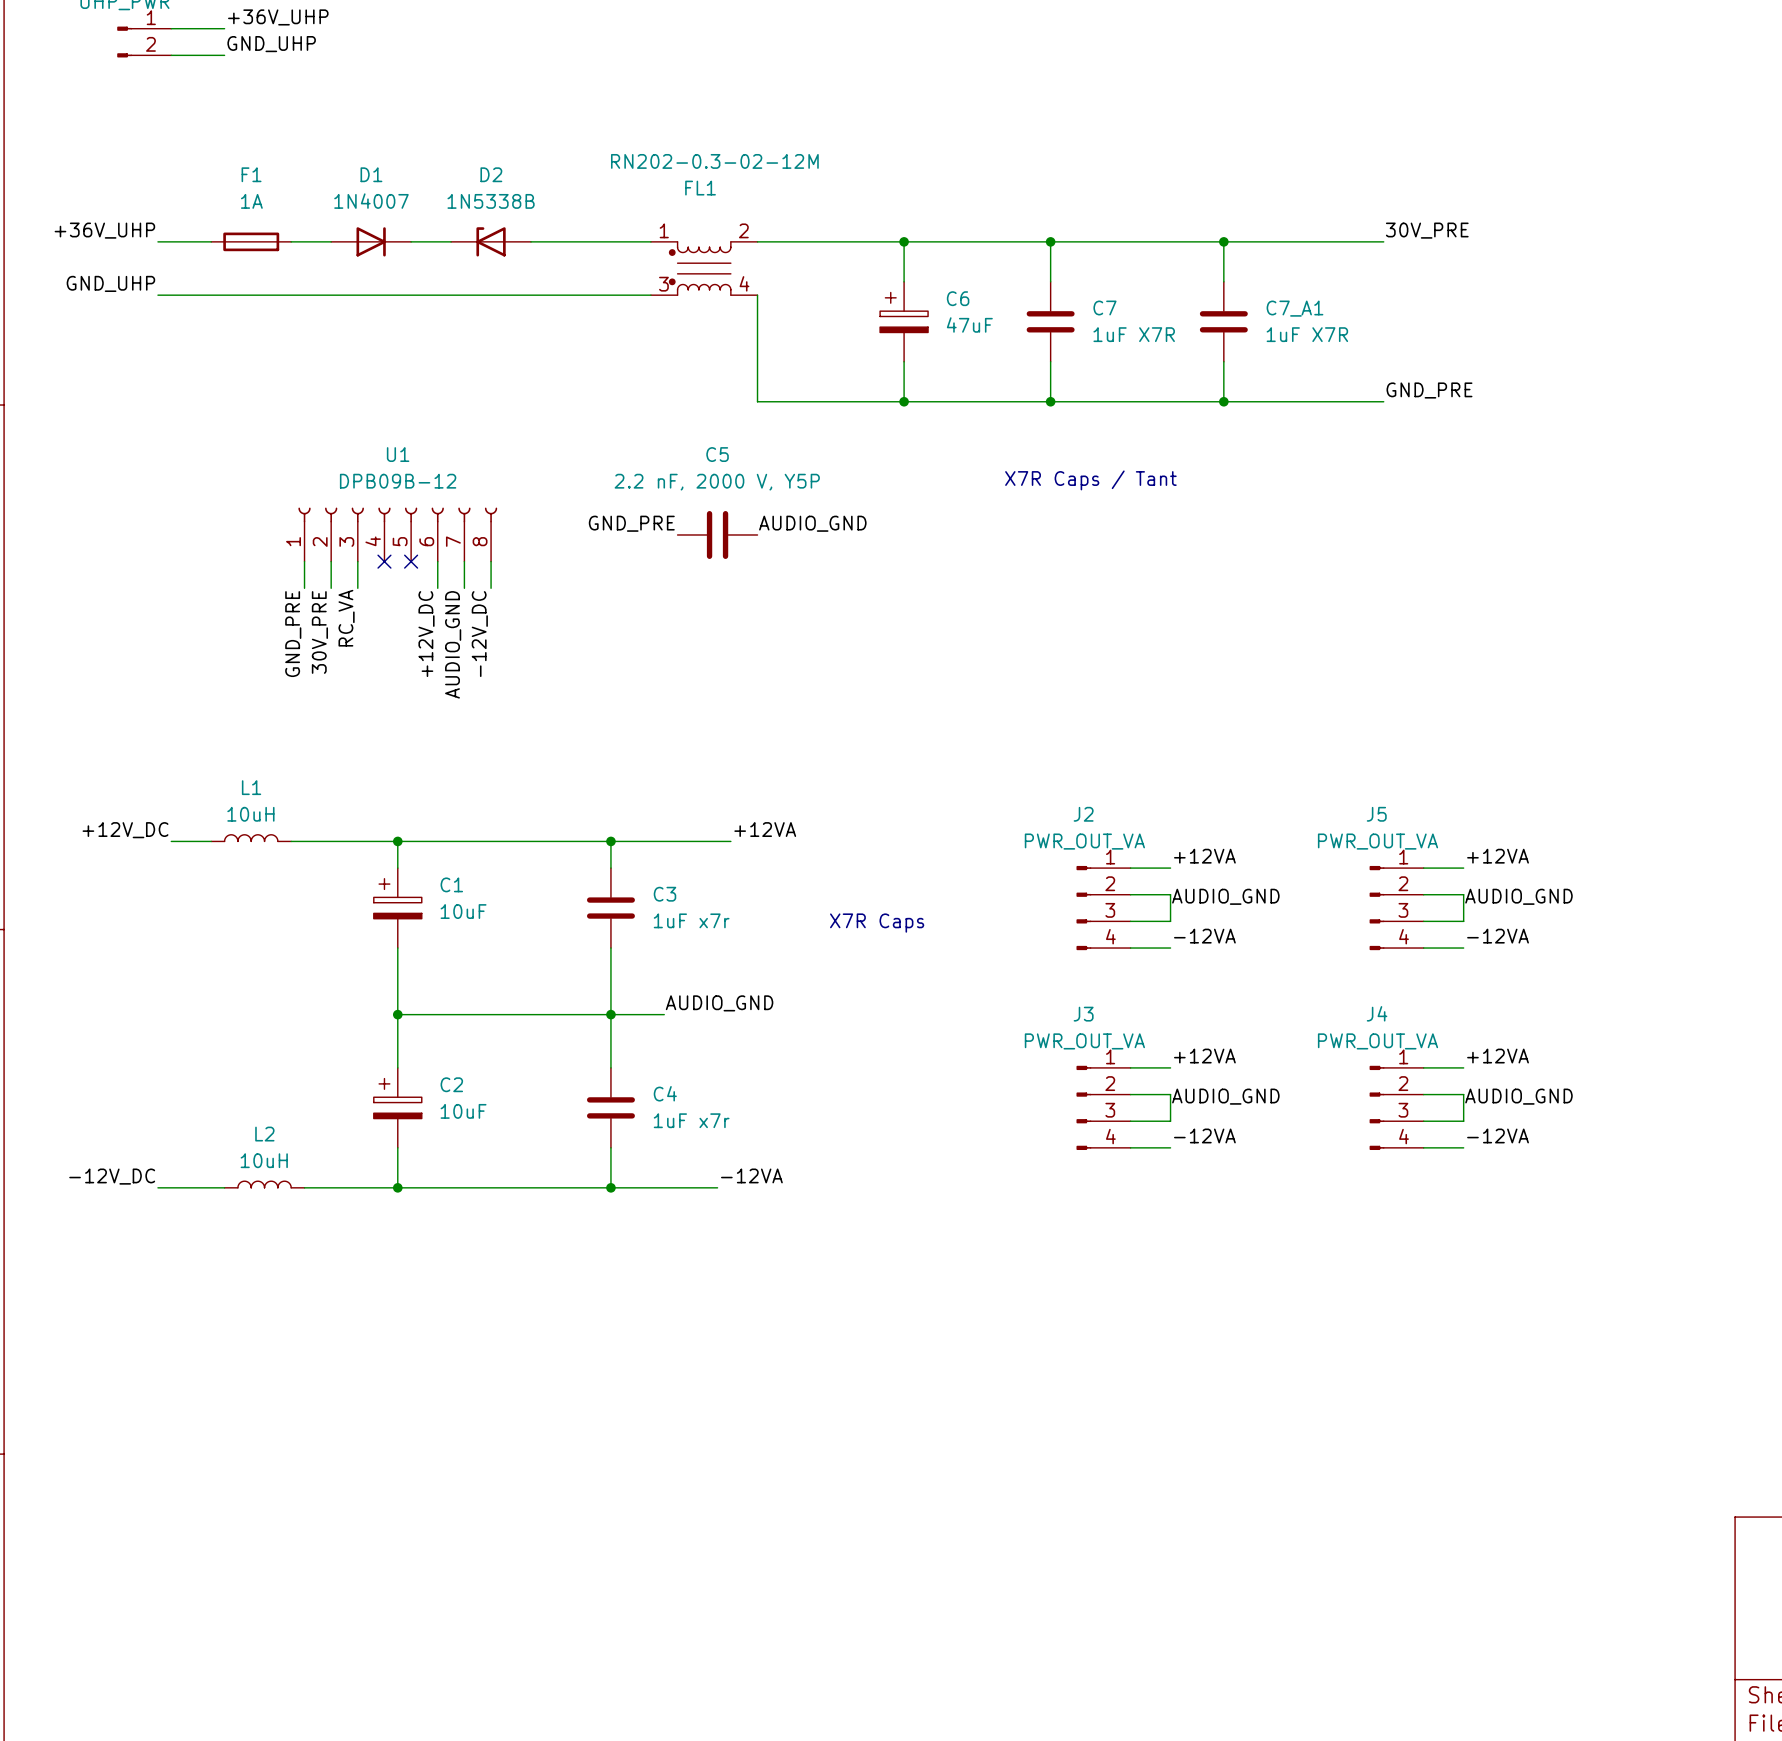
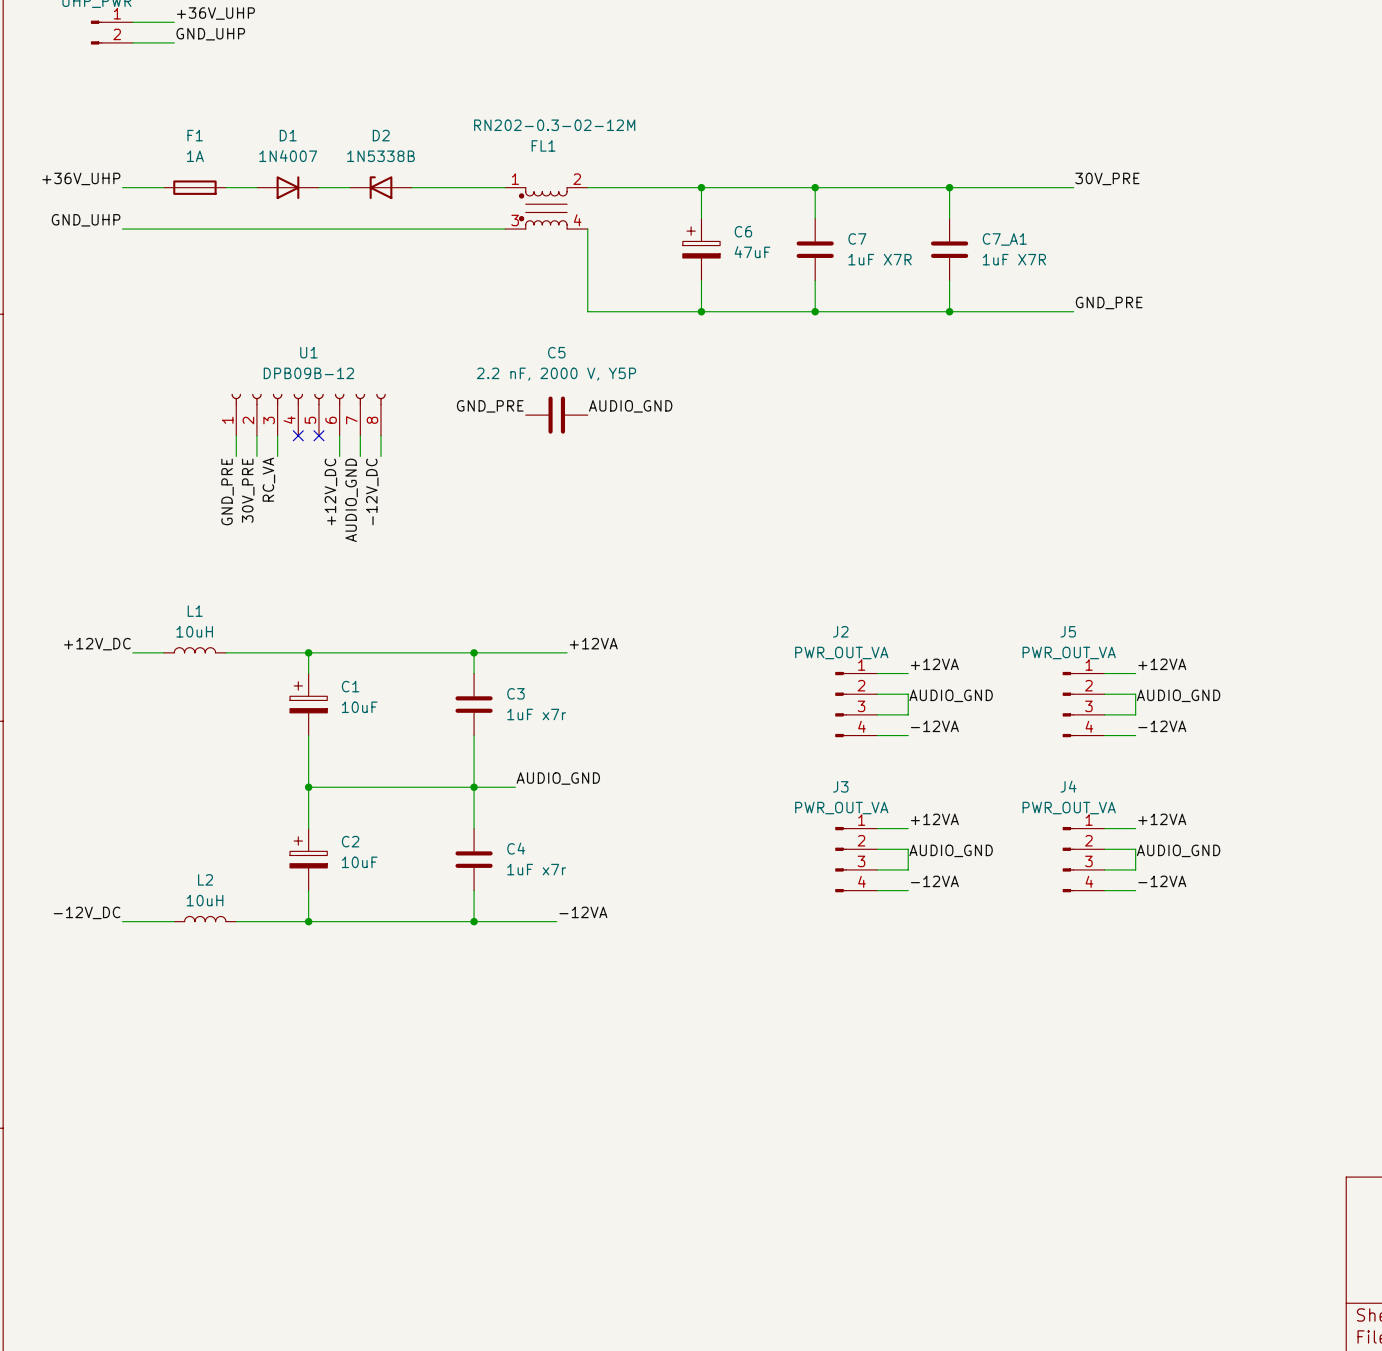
text: X7R Caps / Tant (1090, 480) -> none
text: X7R Caps (877, 923) -> none

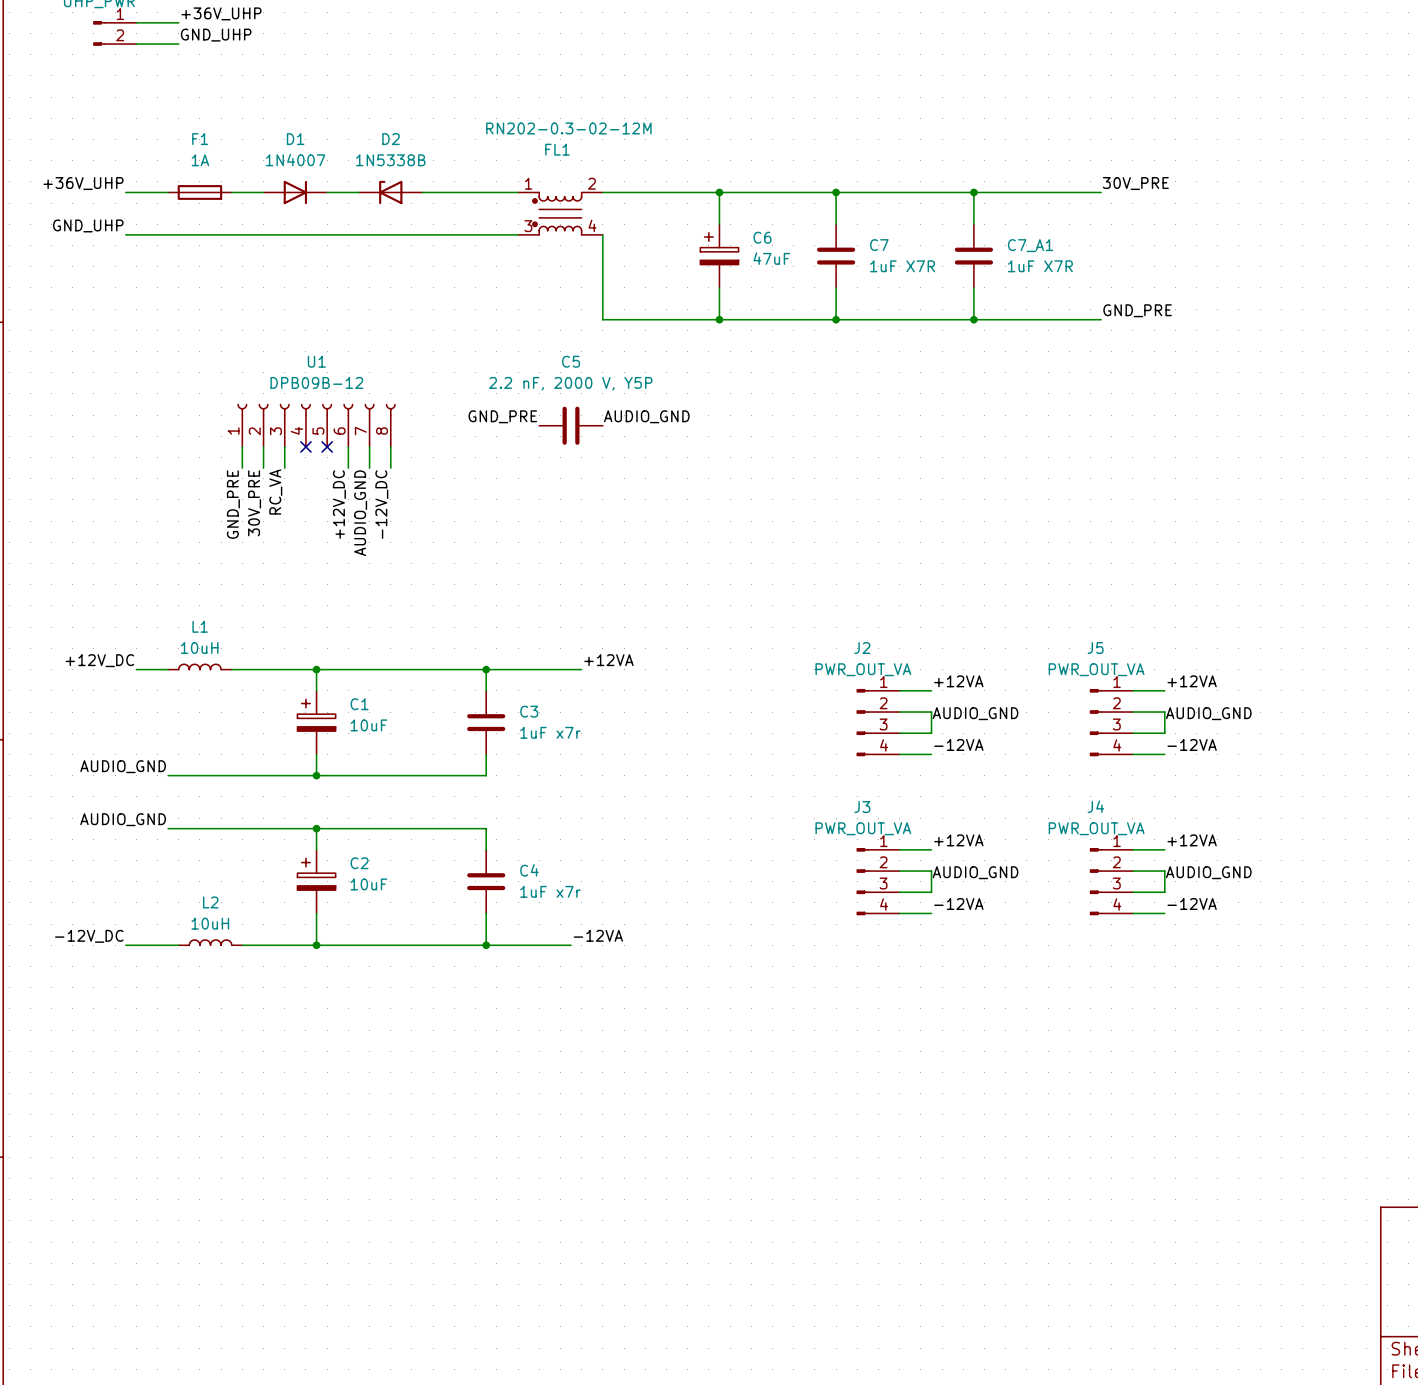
label: none -> AUDIO_GND (123, 766)
wire: (308, 756) (308, 807) -> none
junction: none -> (316, 775)
wire: (474, 756) (474, 807) -> (486, 775) (168, 775)
label: AUDIO_GND (558, 778) -> none
wire: (308, 787) (515, 787) -> none
junction: (308, 787) -> none
junction: (474, 787) -> none
label: none -> AUDIO_GND (123, 819)
wire: none -> (168, 828) (486, 828)
junction: none -> (316, 828)

